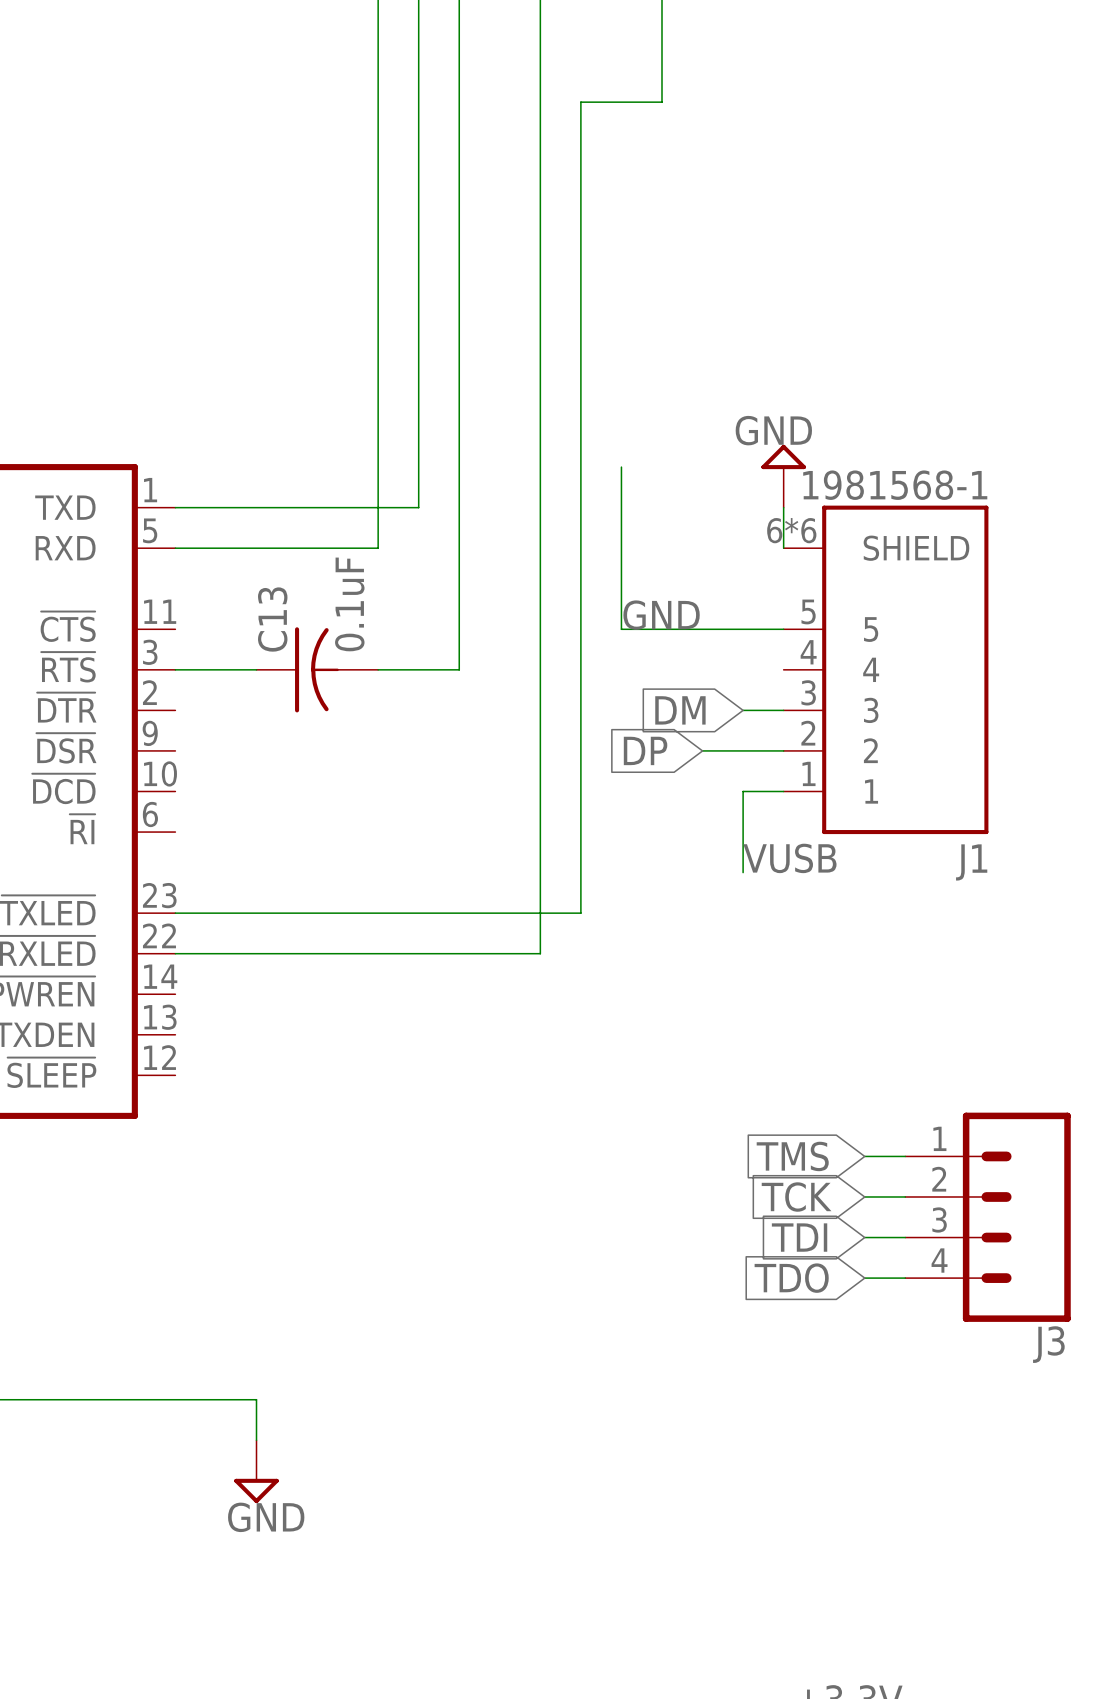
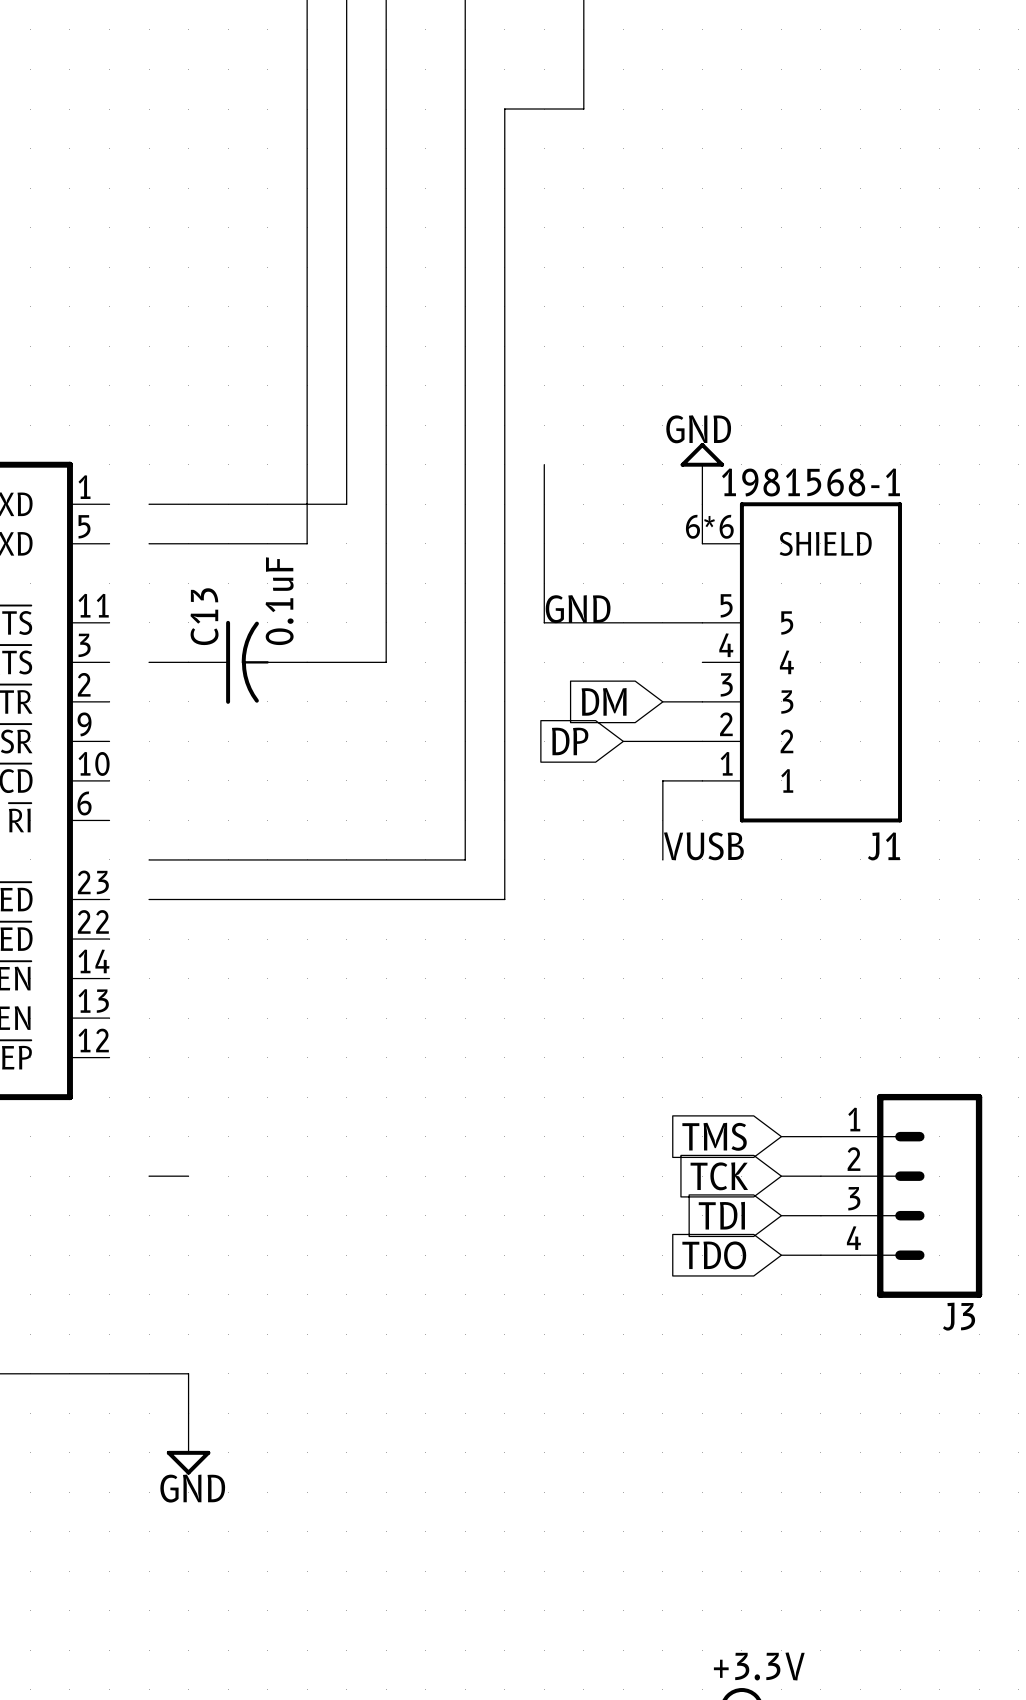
wire: (175, 507) (215, 507) -> none
wire: (175, 548) (215, 548) -> none
wire: (175, 669) (215, 669) -> none
wire: (540, 872) (540, 953) (175, 953) -> (465, 859) (149, 859)
wire: (175, 913) (215, 913) -> (149, 1176) (188, 1176)

